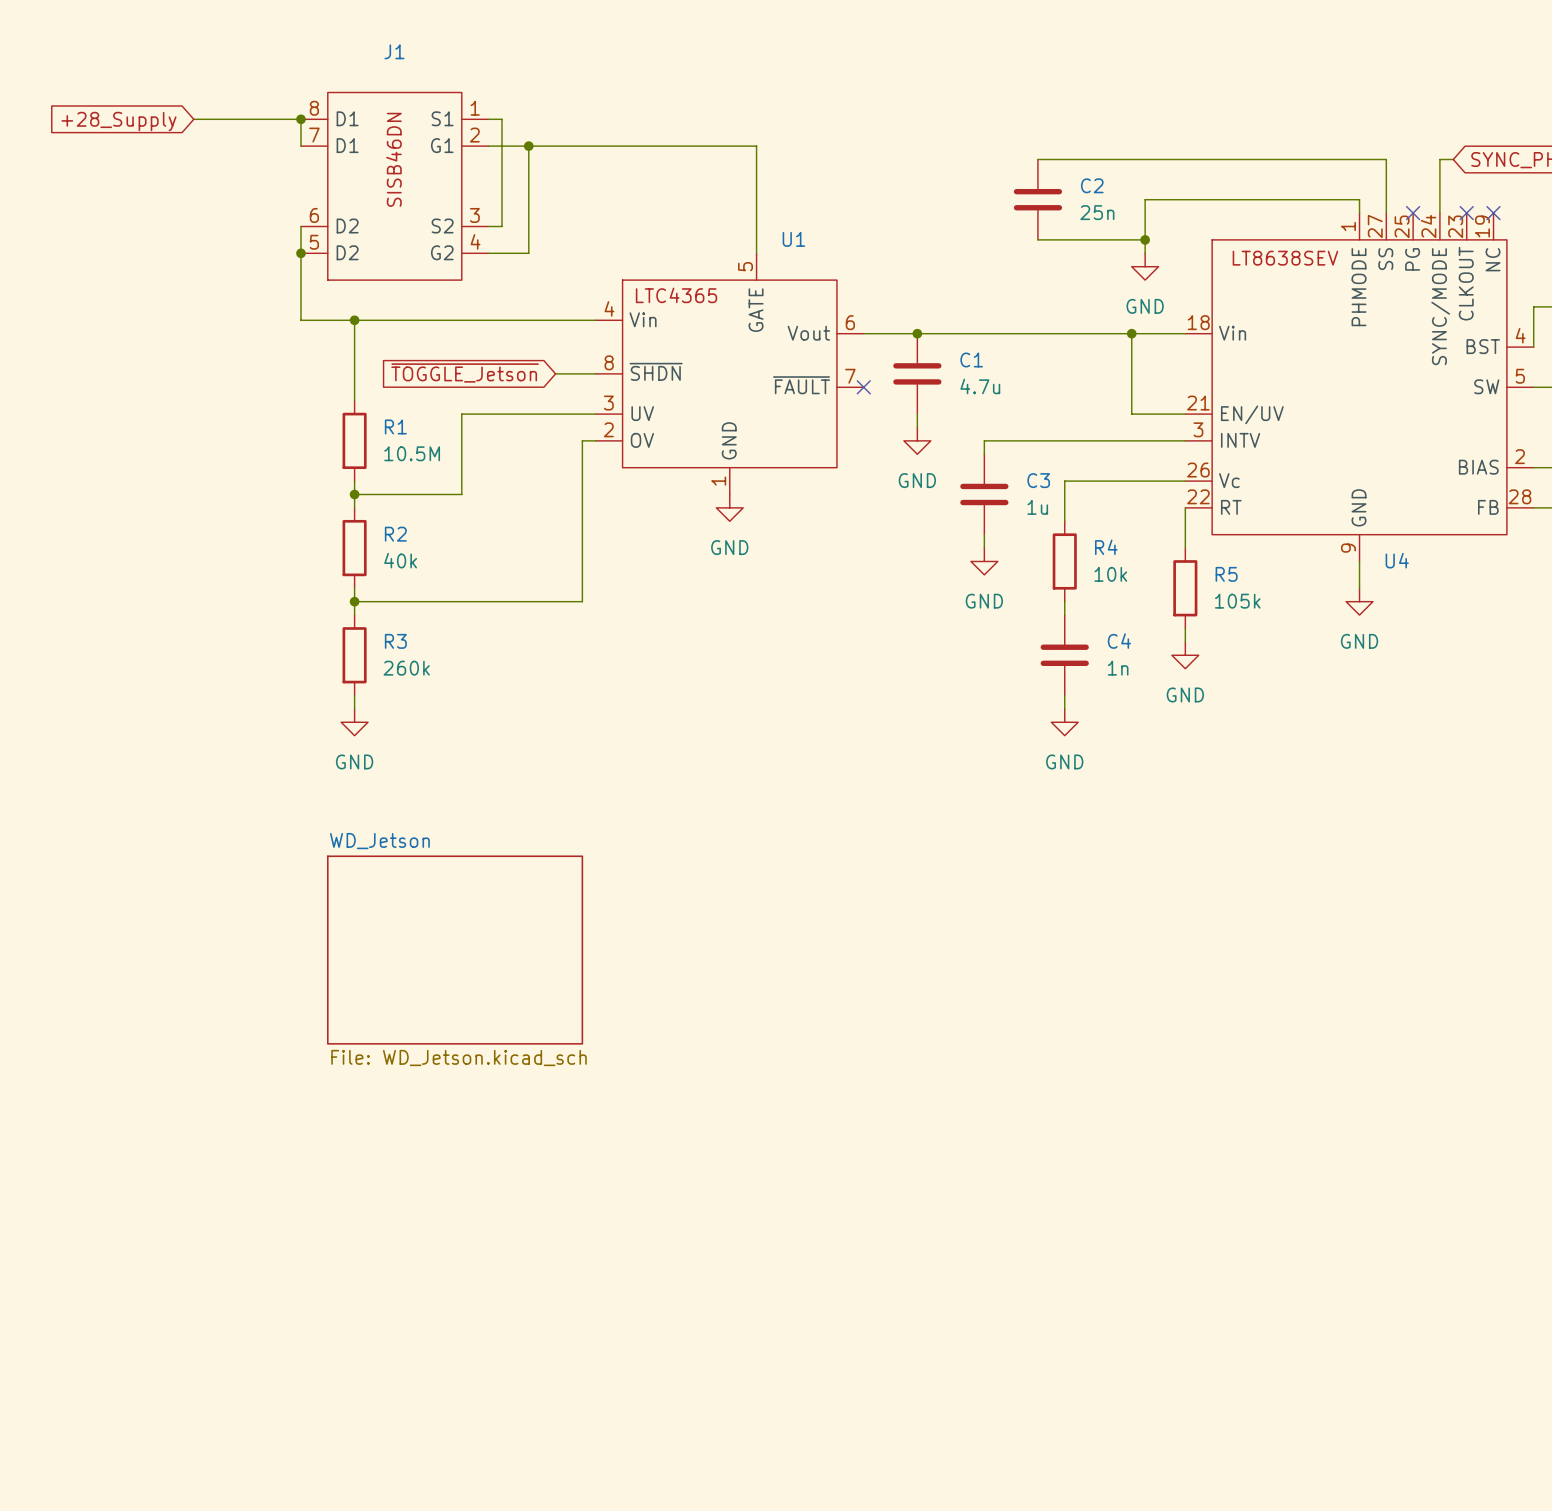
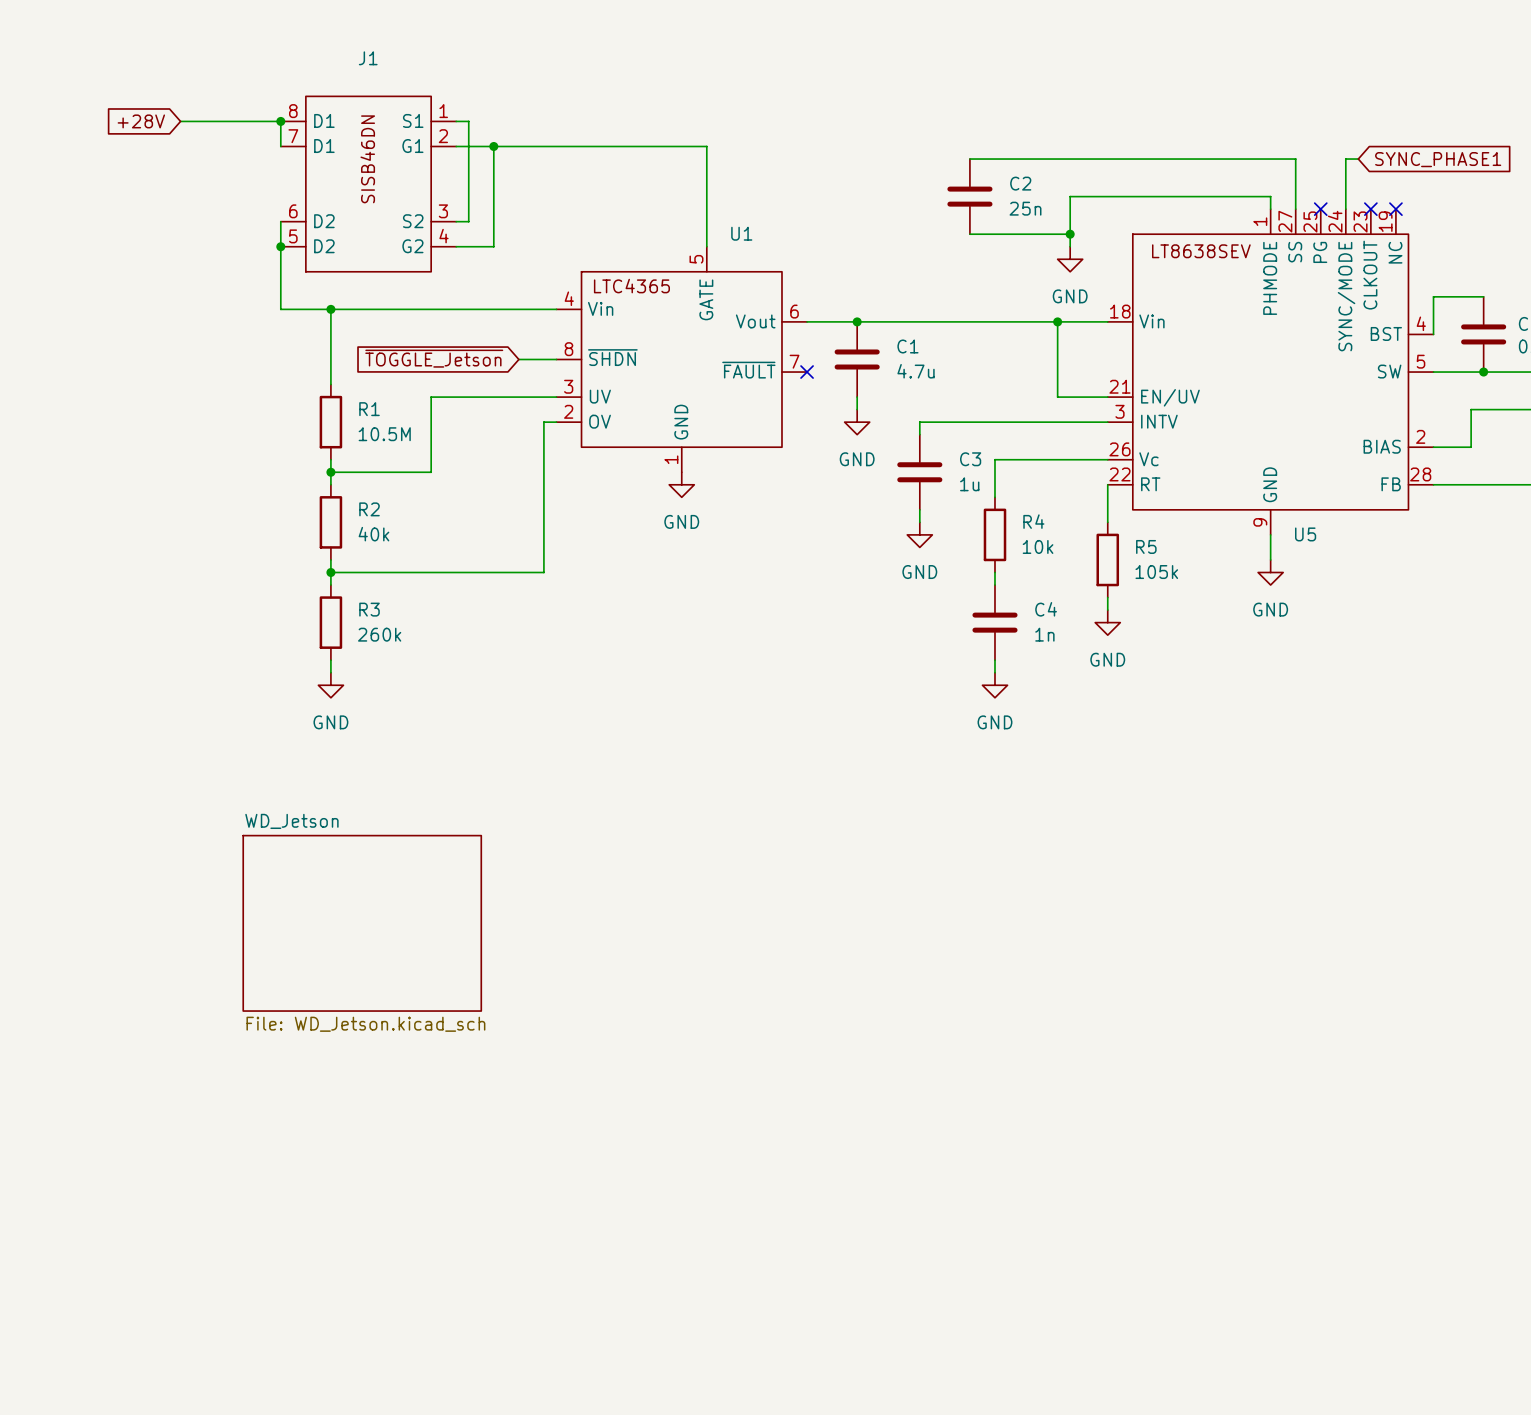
global label: +28_Supply (118, 121) -> +28V (141, 121)
U4 name: U4 (1397, 560) -> U5 (1305, 534)
sheet WD_Jetson position: (455, 950) -> (362, 923)

